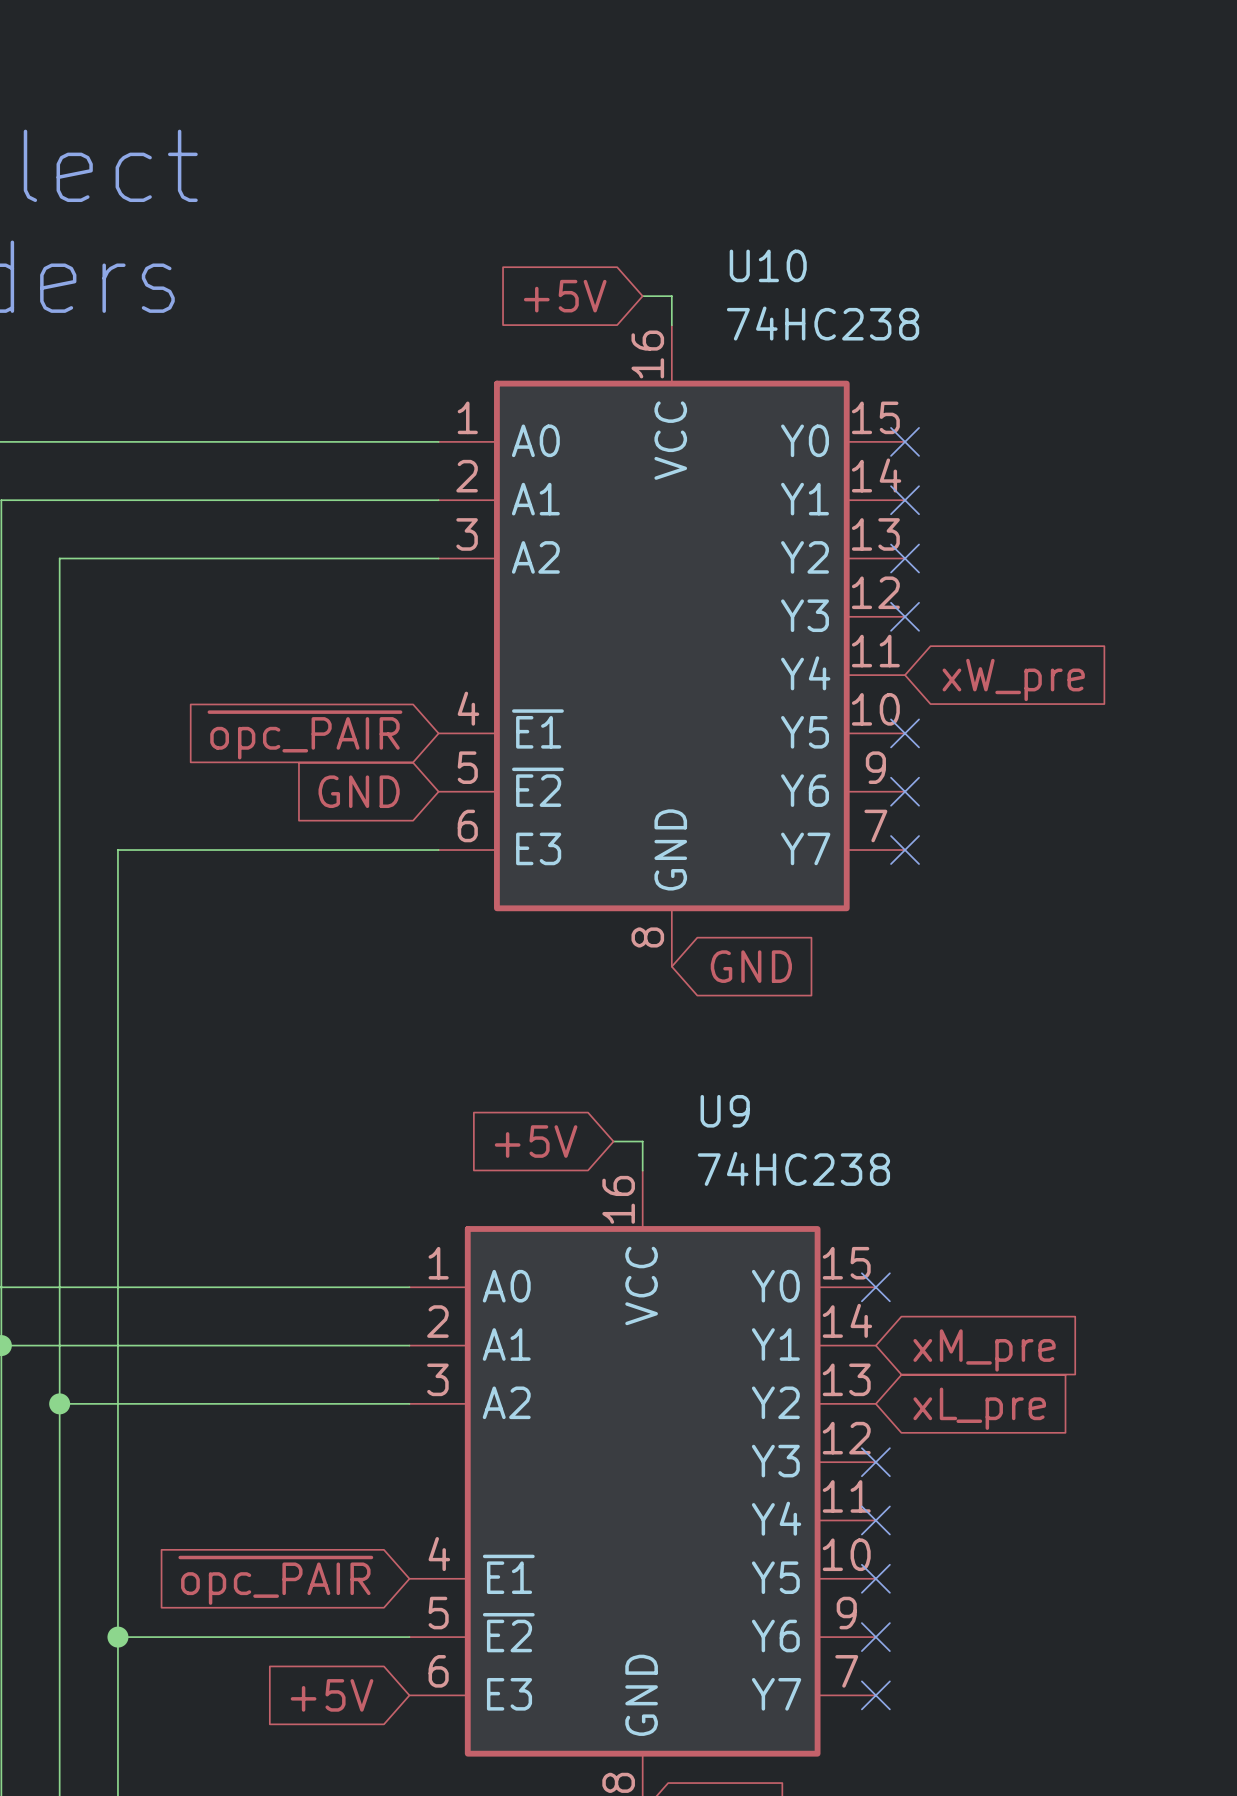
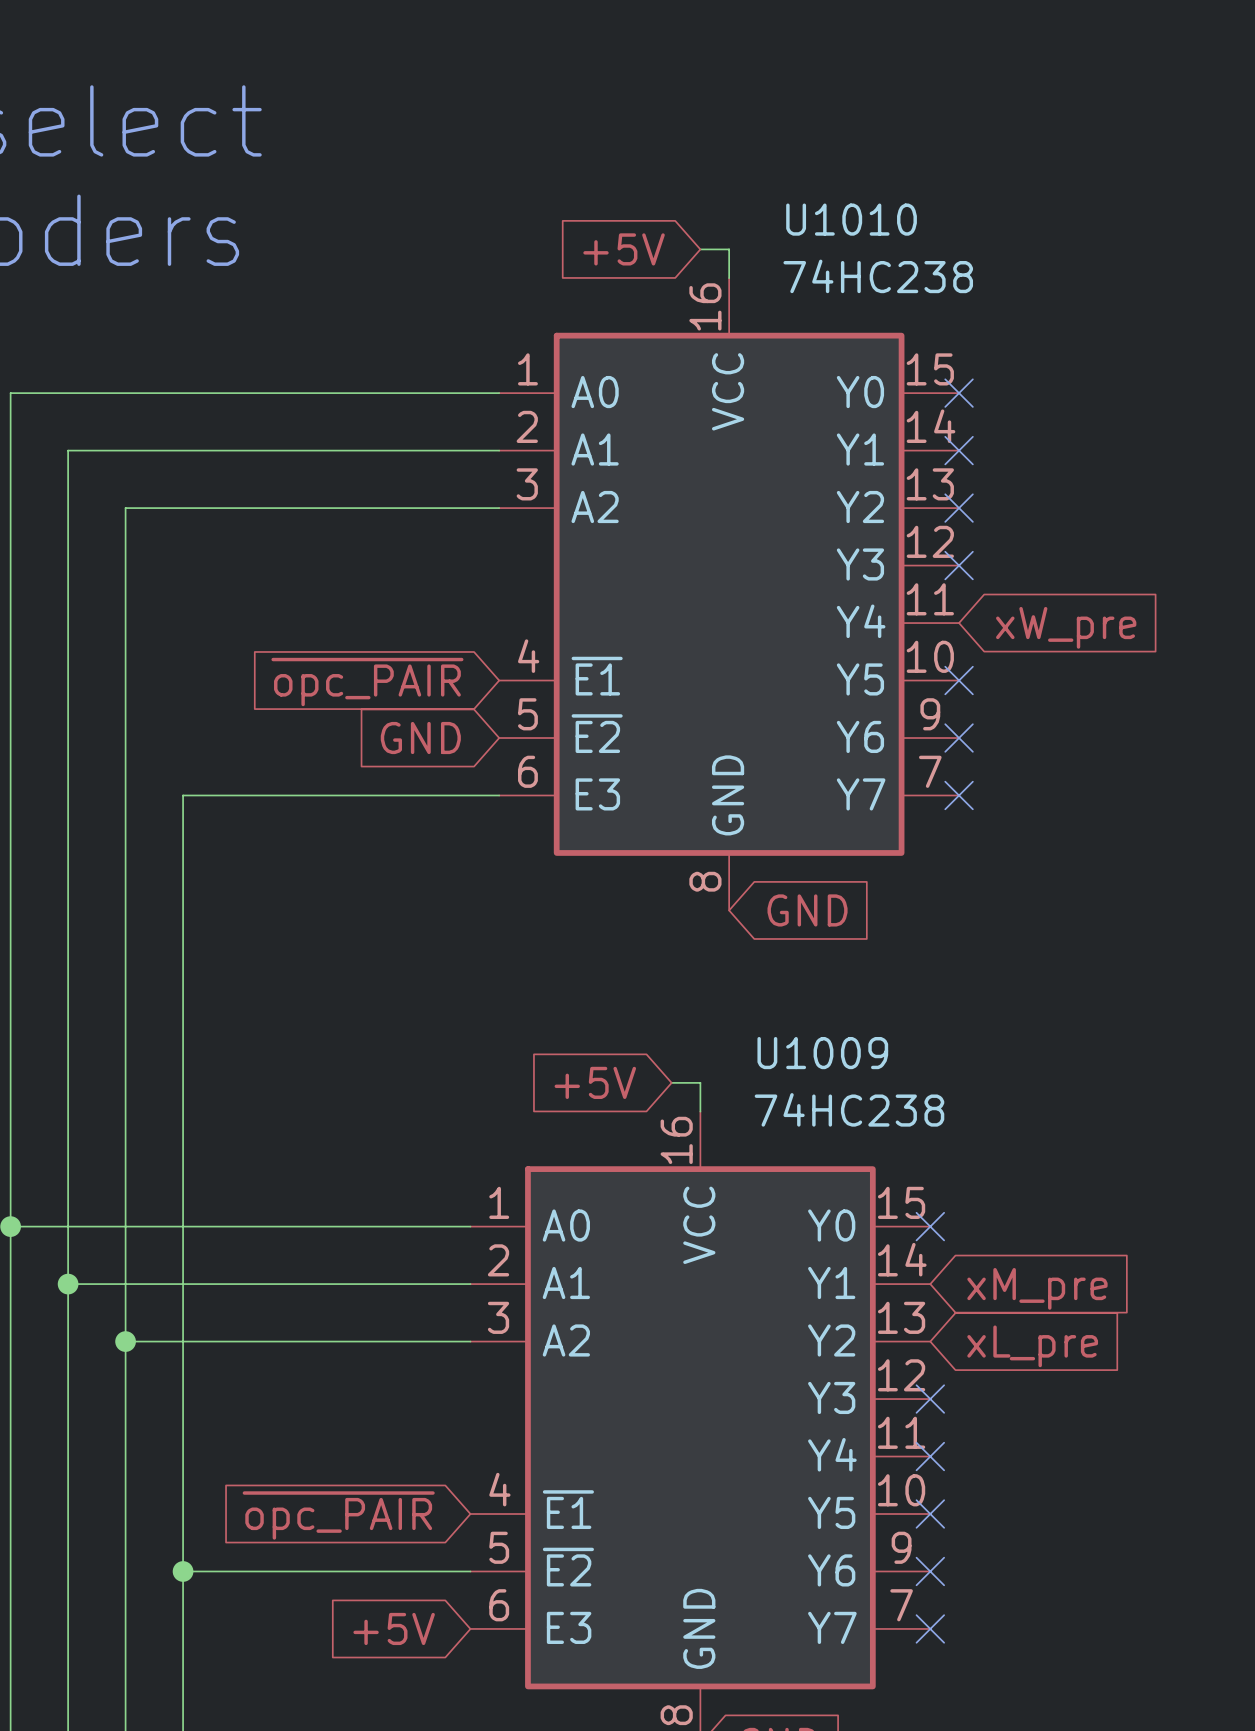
U10 name: U10 (768, 265) -> U1010 (851, 219)
U9 name: U9 (725, 1111) -> U1009 (822, 1053)

